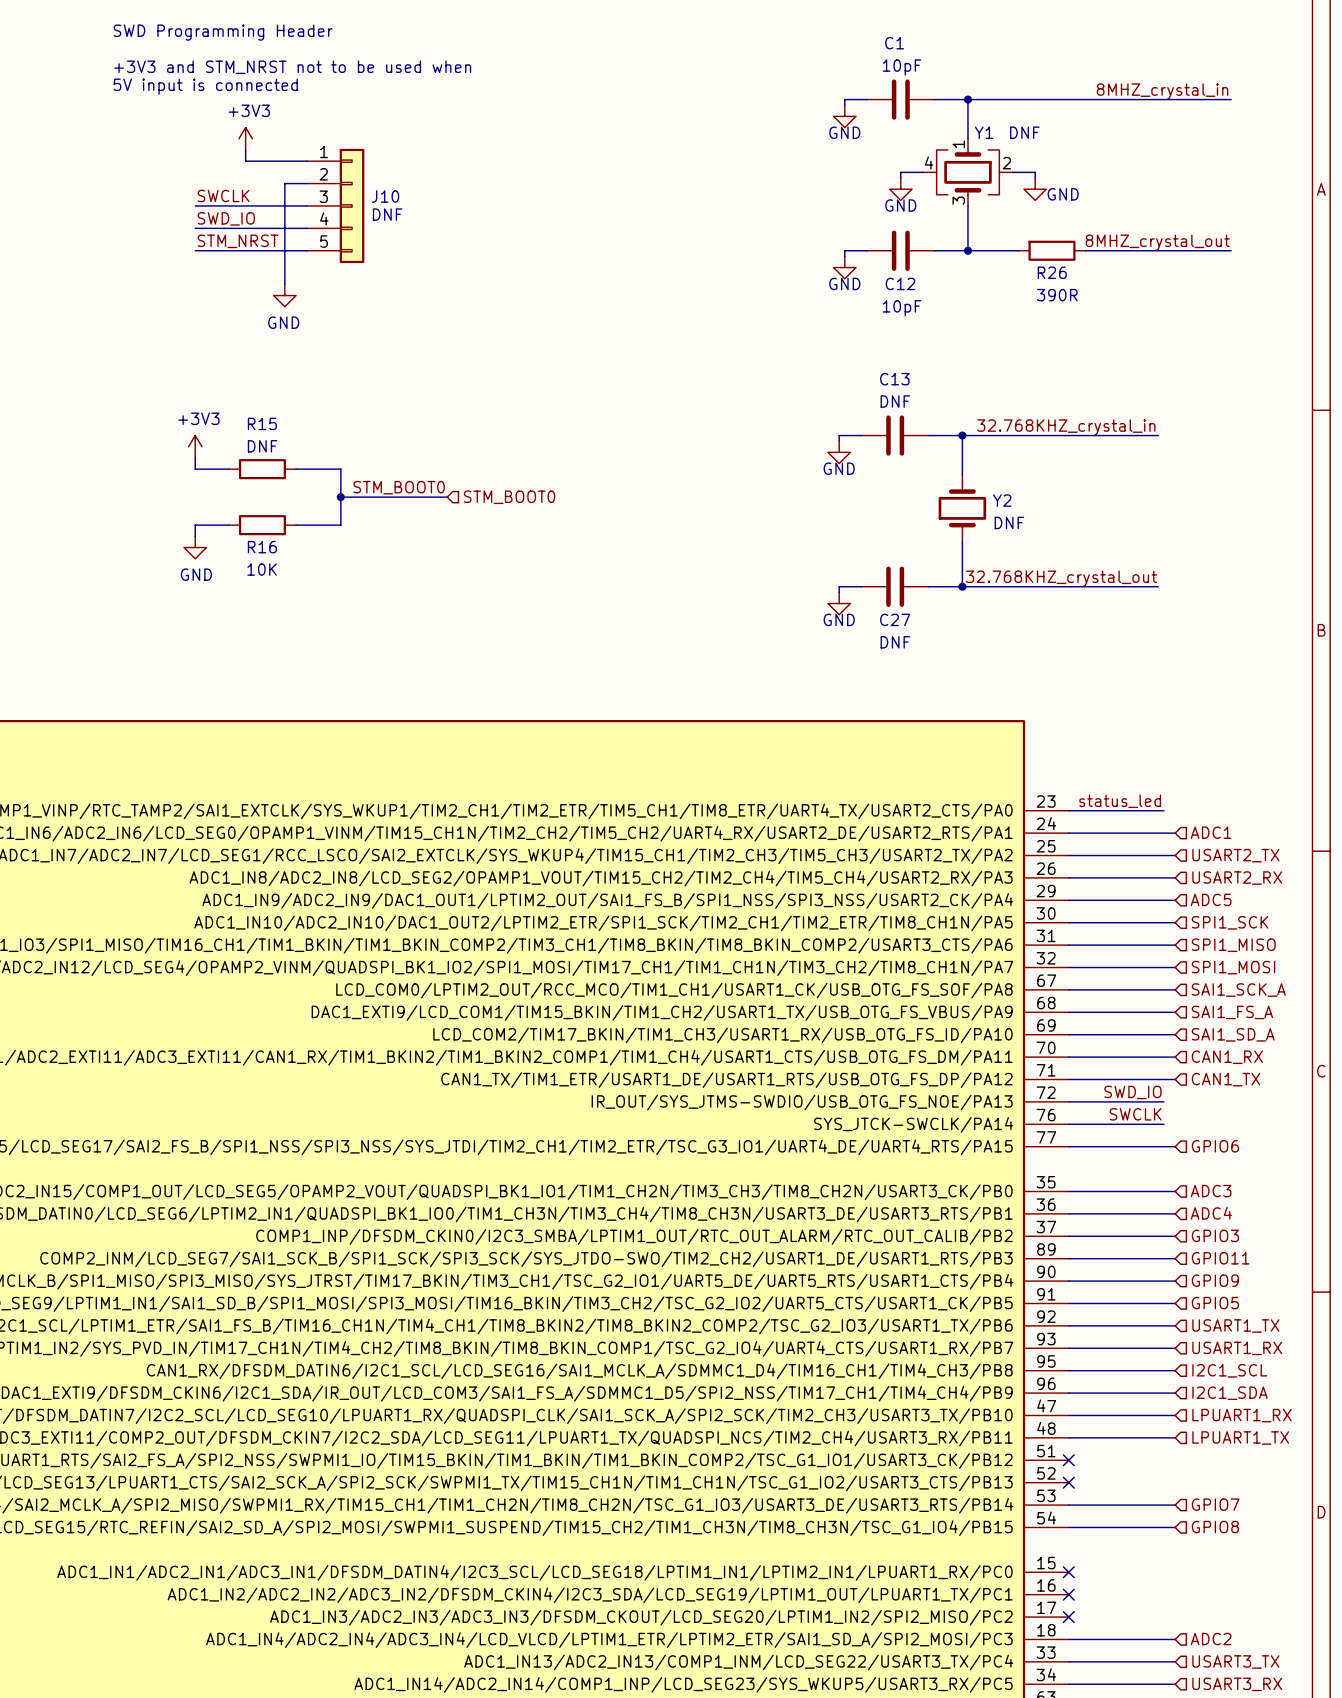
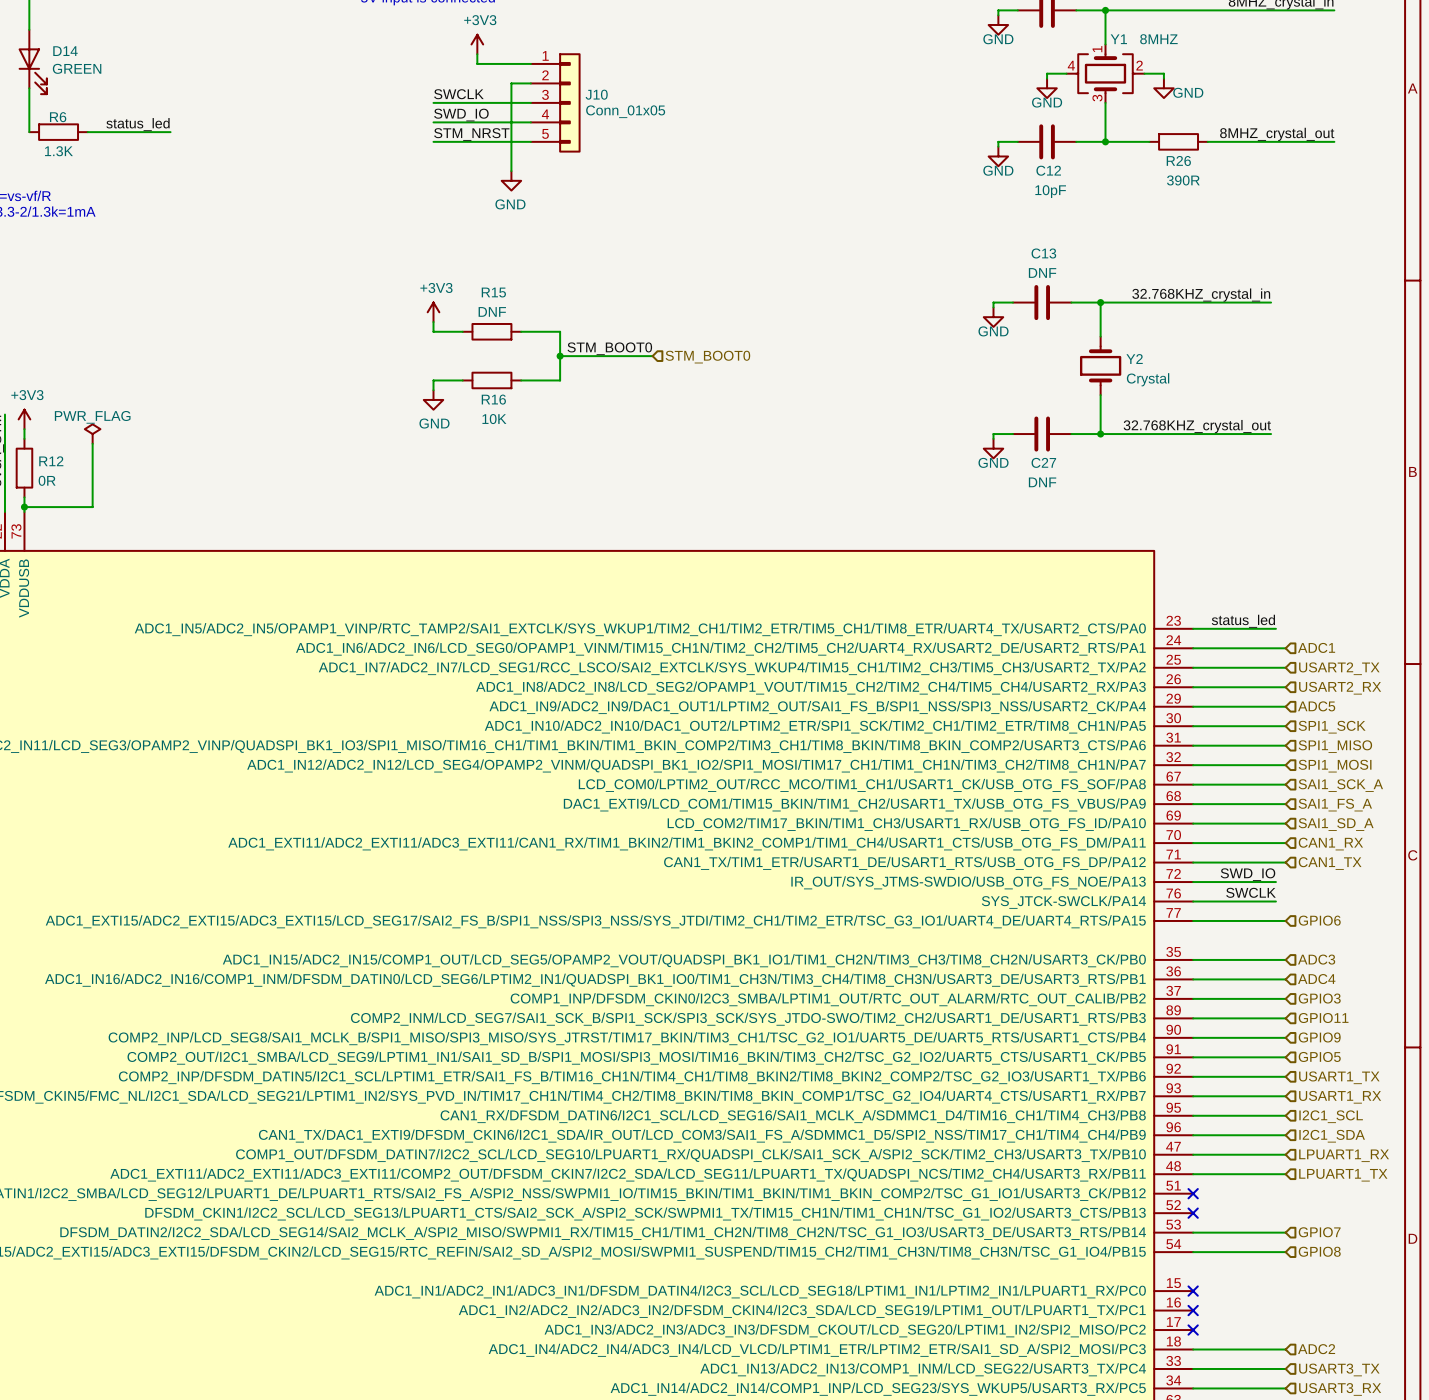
Y1 value: DNF (1024, 132) -> 8MHZ (1158, 39)
J10 value: DNF (387, 214) -> Conn_01x05 (625, 111)
Y2 value: DNF (1009, 522) -> Crystal (1148, 379)

